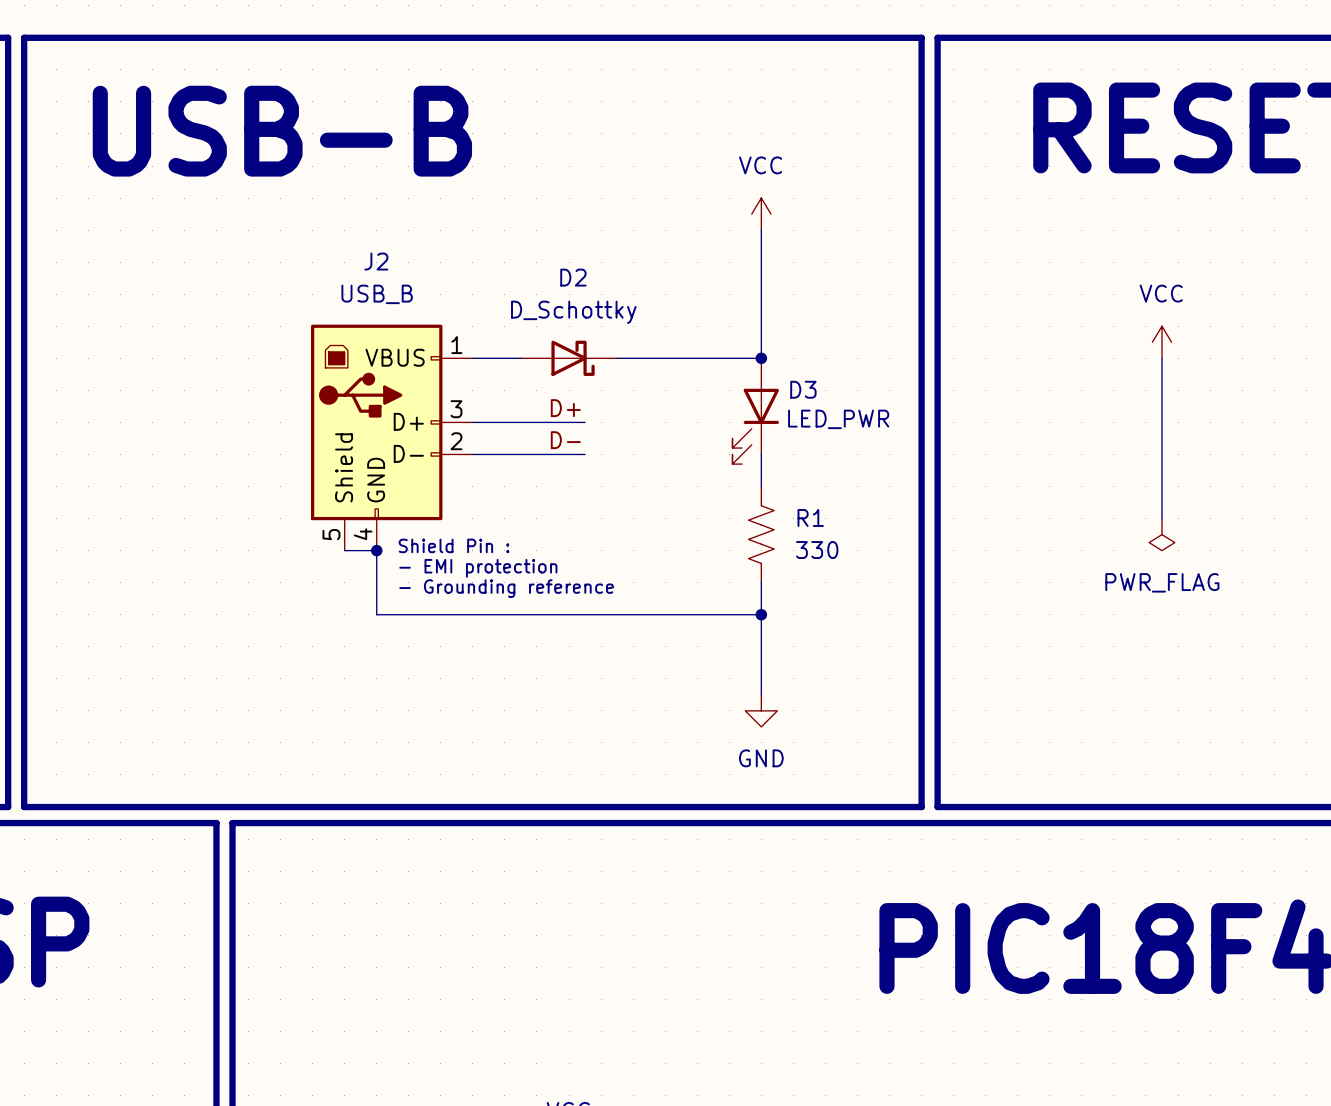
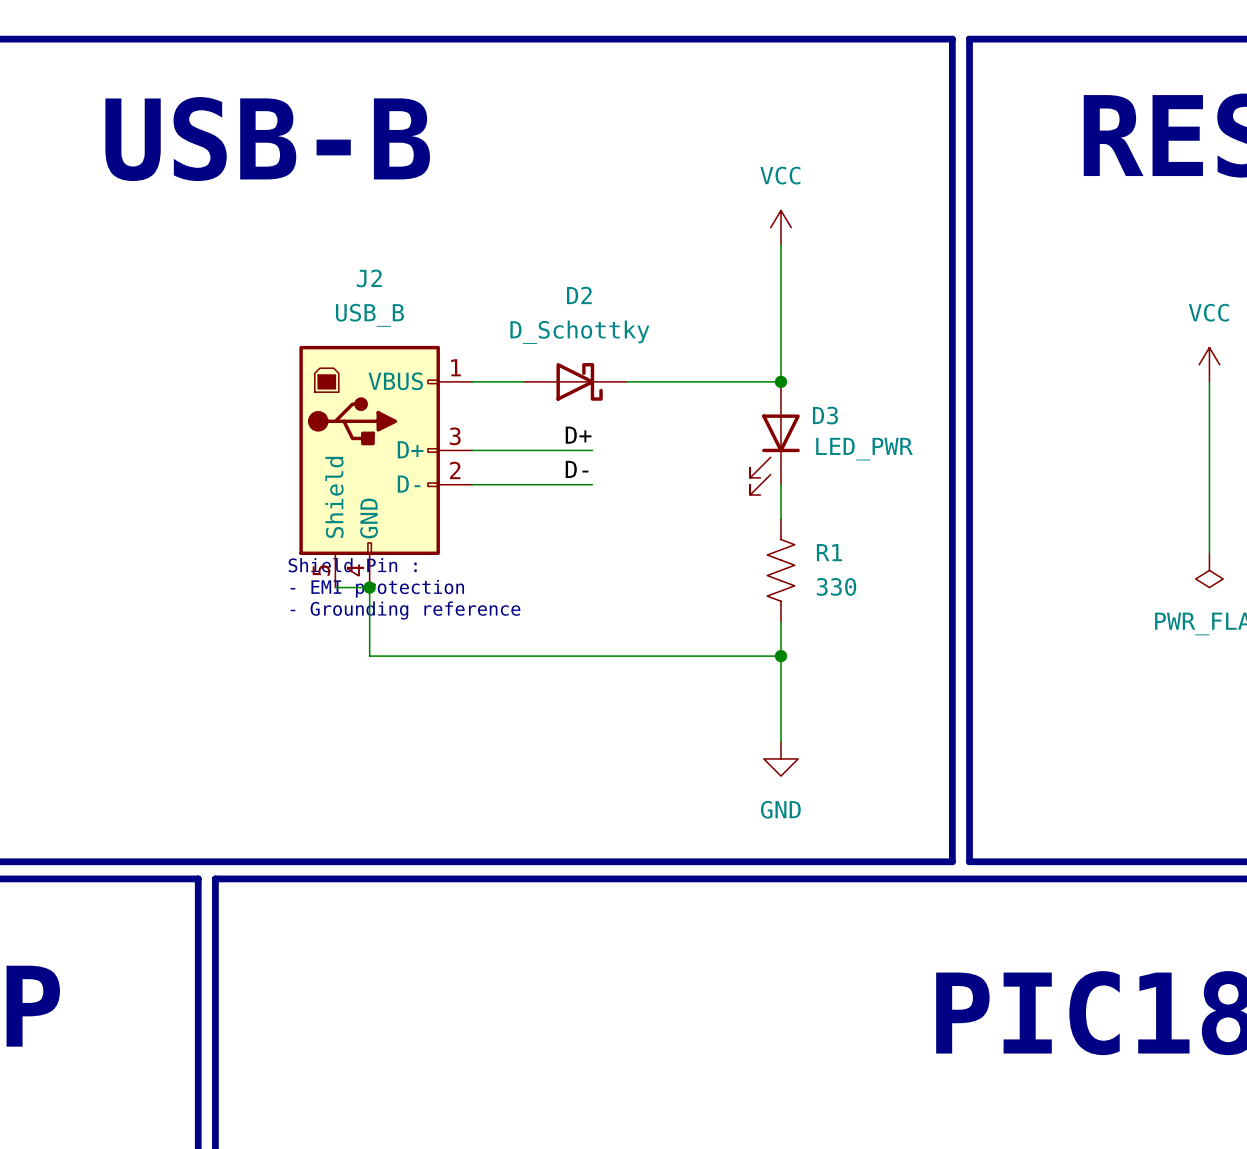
text position: Shield Pin : (454, 545) -> Shield Pin : (352, 565)
text position: - EMI protection (478, 568) -> - EMI protection (377, 588)
text position: - Grounding reference (506, 588) -> - Grounding reference (405, 610)

